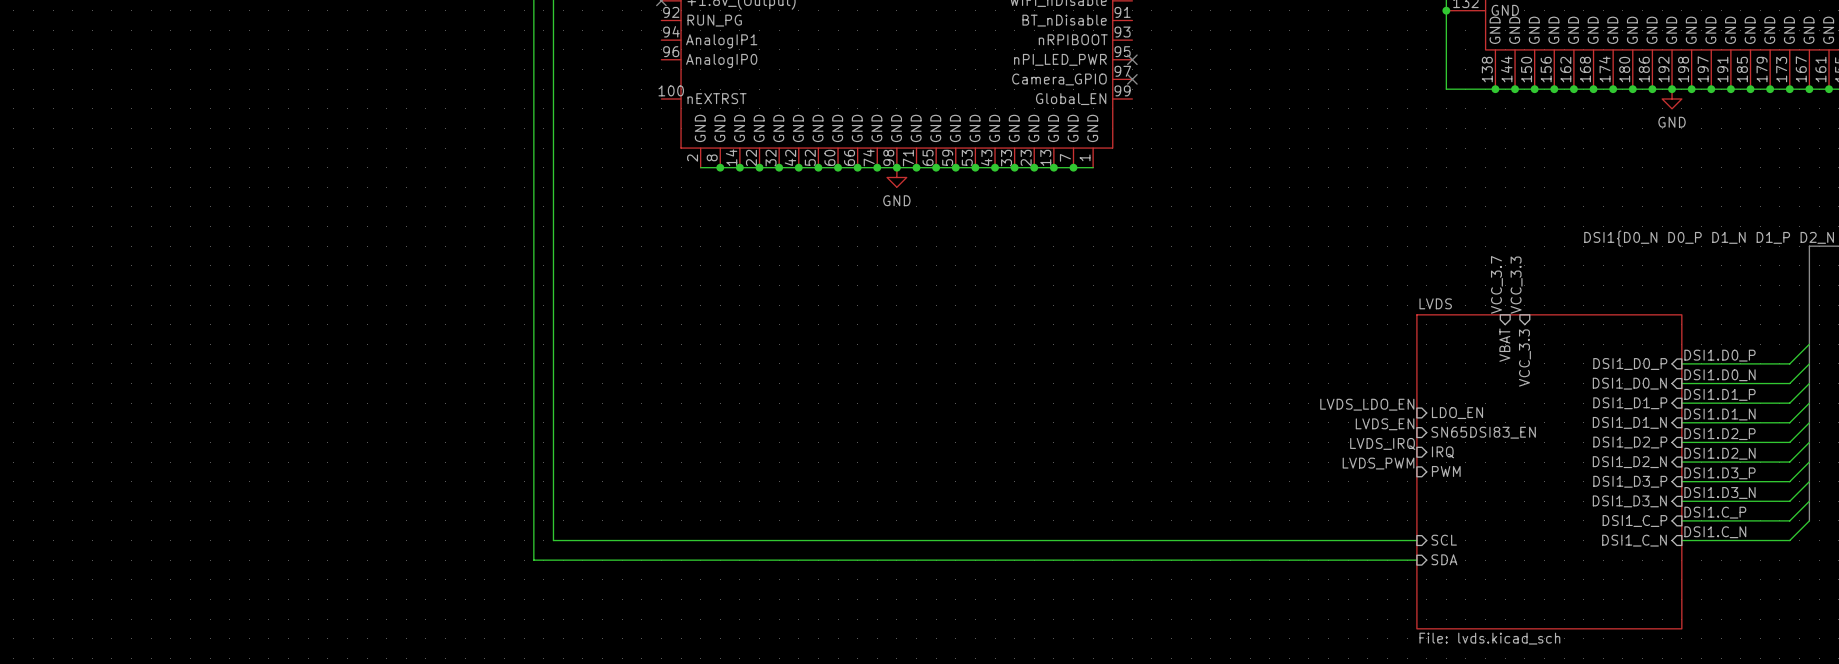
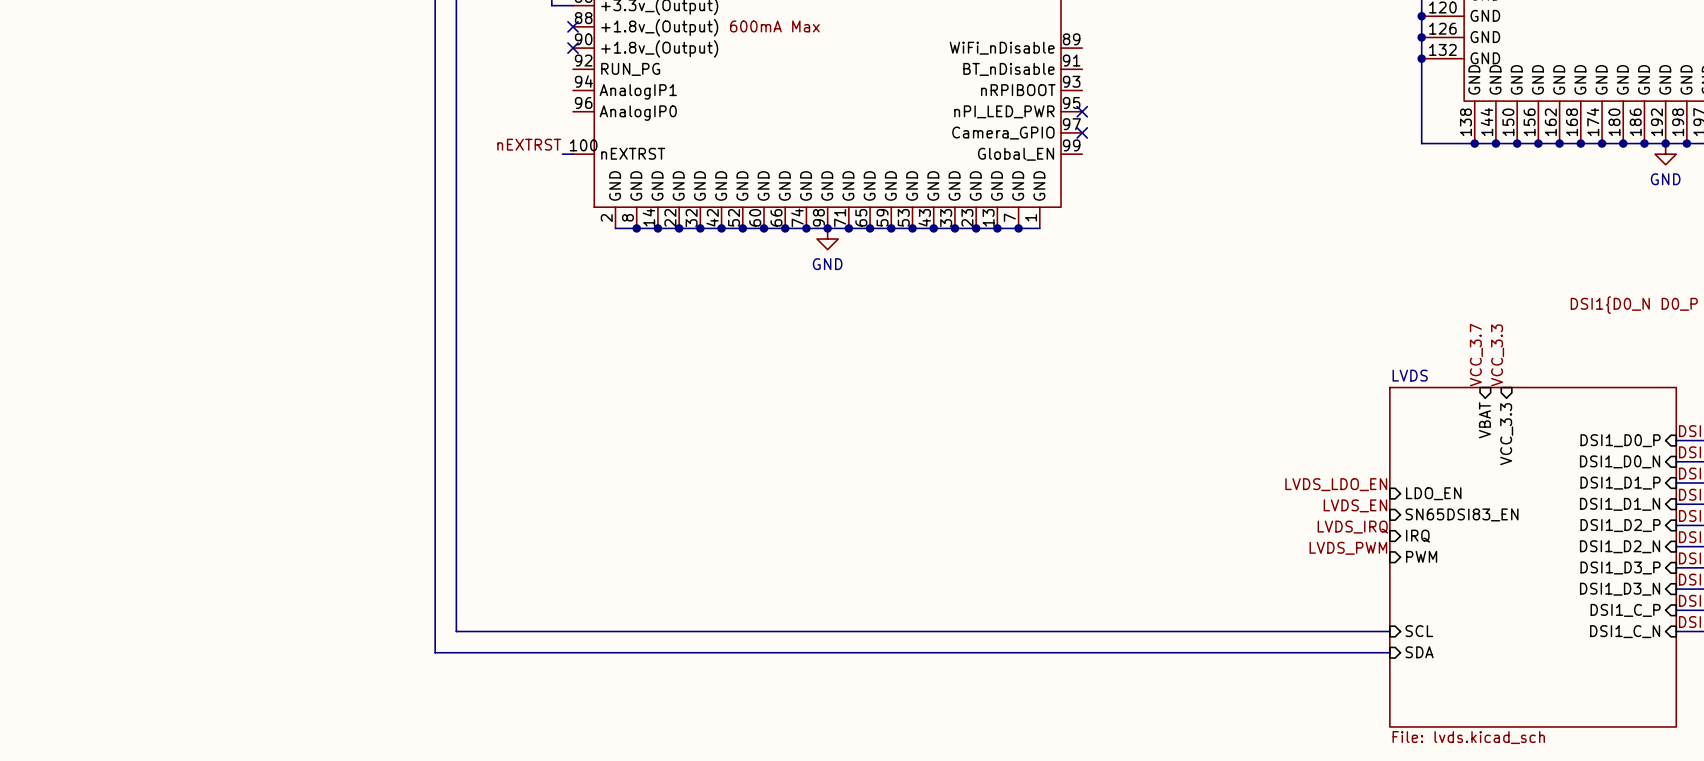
label: none -> nEXTRST (529, 144)
wire: none -> (562, 154) (573, 154)

